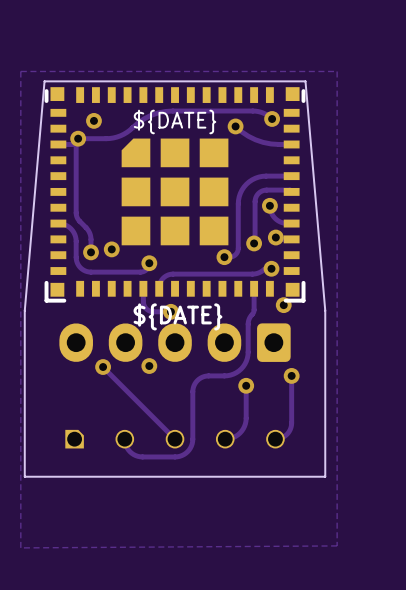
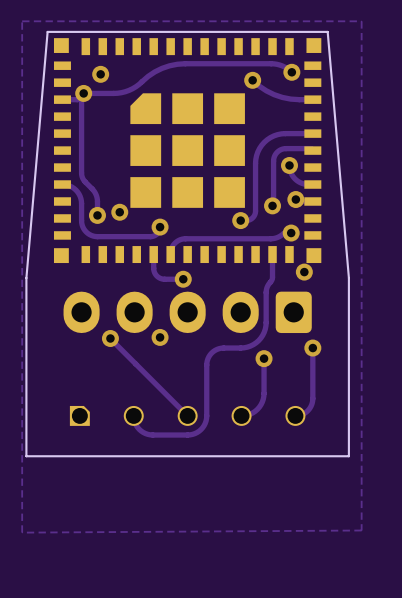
part footprint: [44, 87, 306, 303] -> [53, 38, 322, 264]
text: ${DATE} (177, 316) -> none

